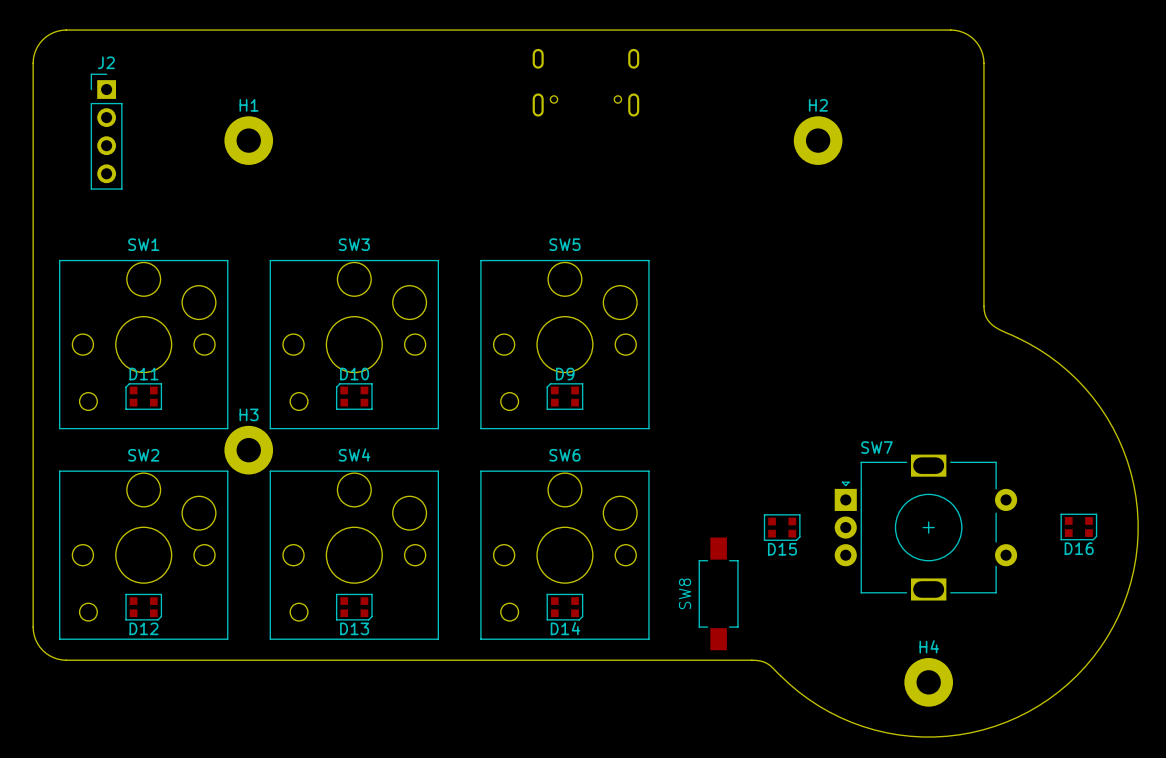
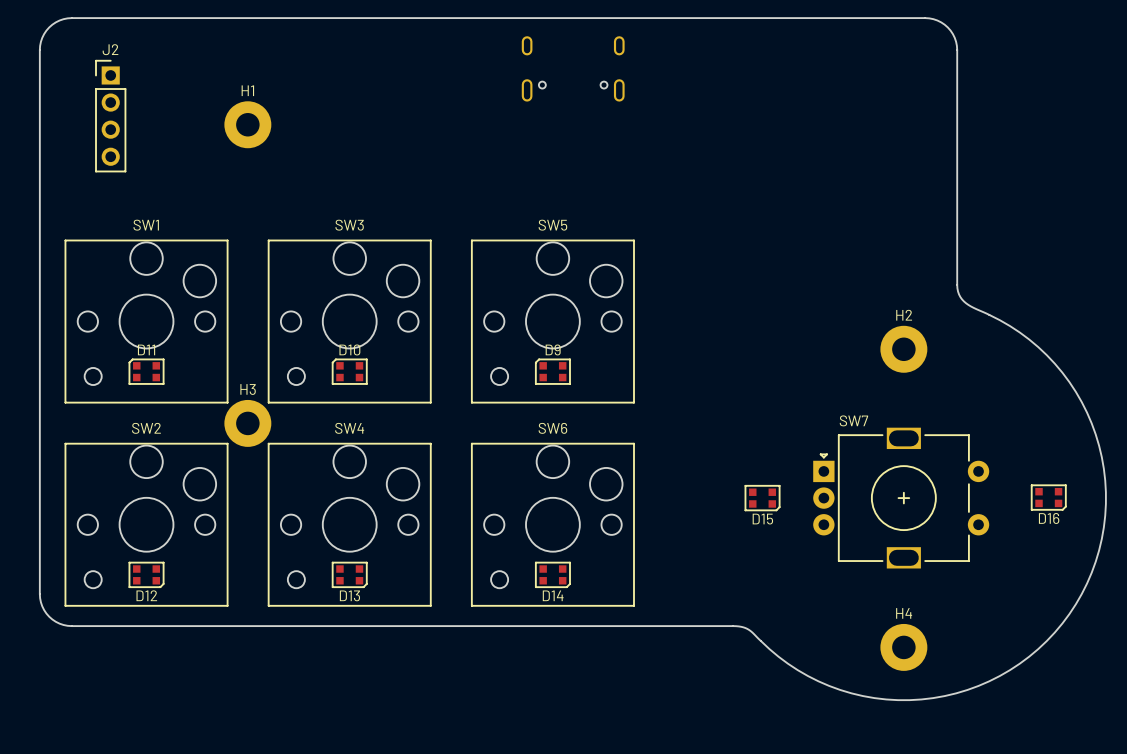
H2 position: (818, 140) -> (903, 349)
SW8: (718, 593) -> none

